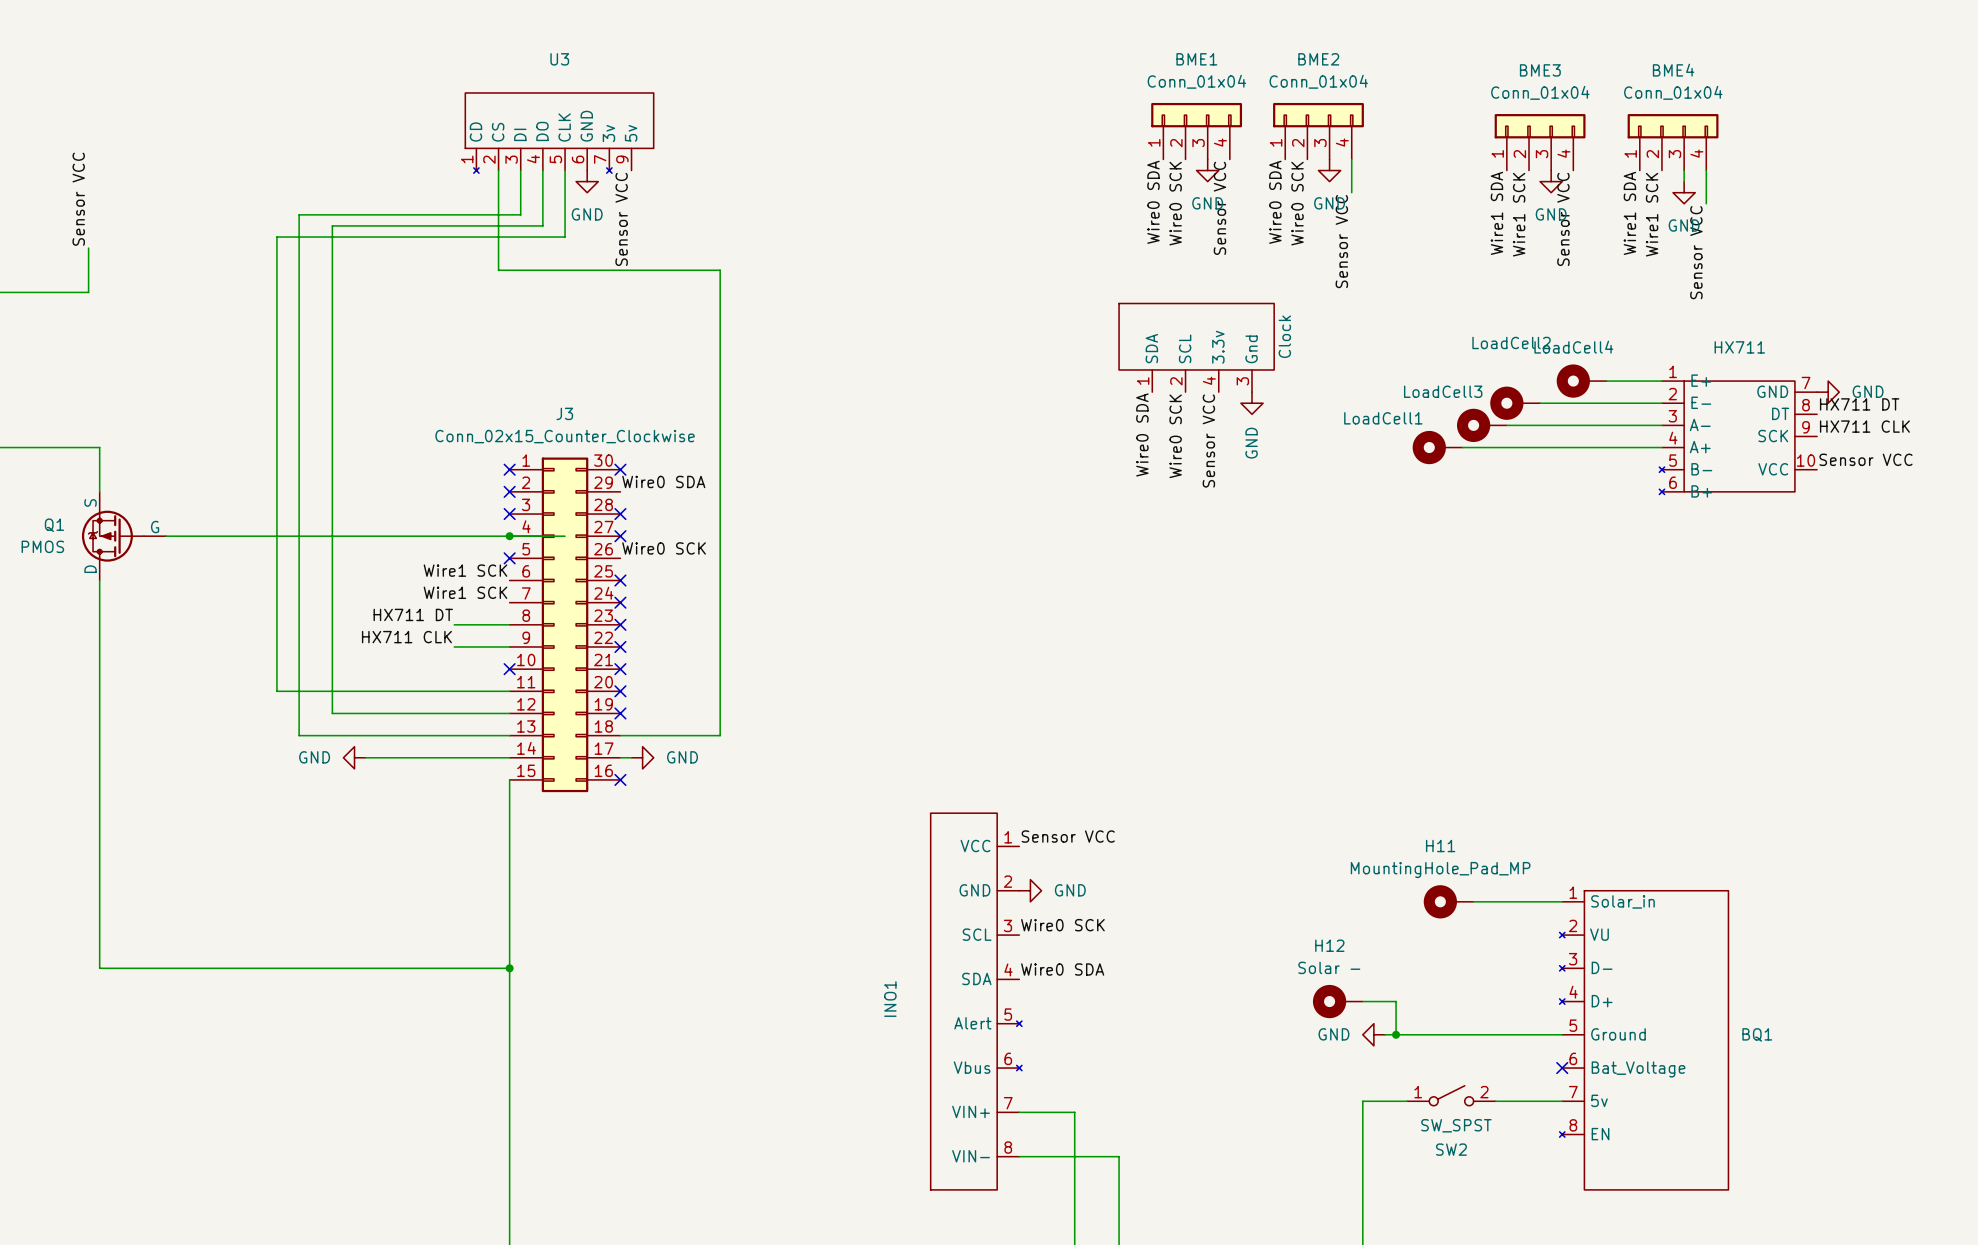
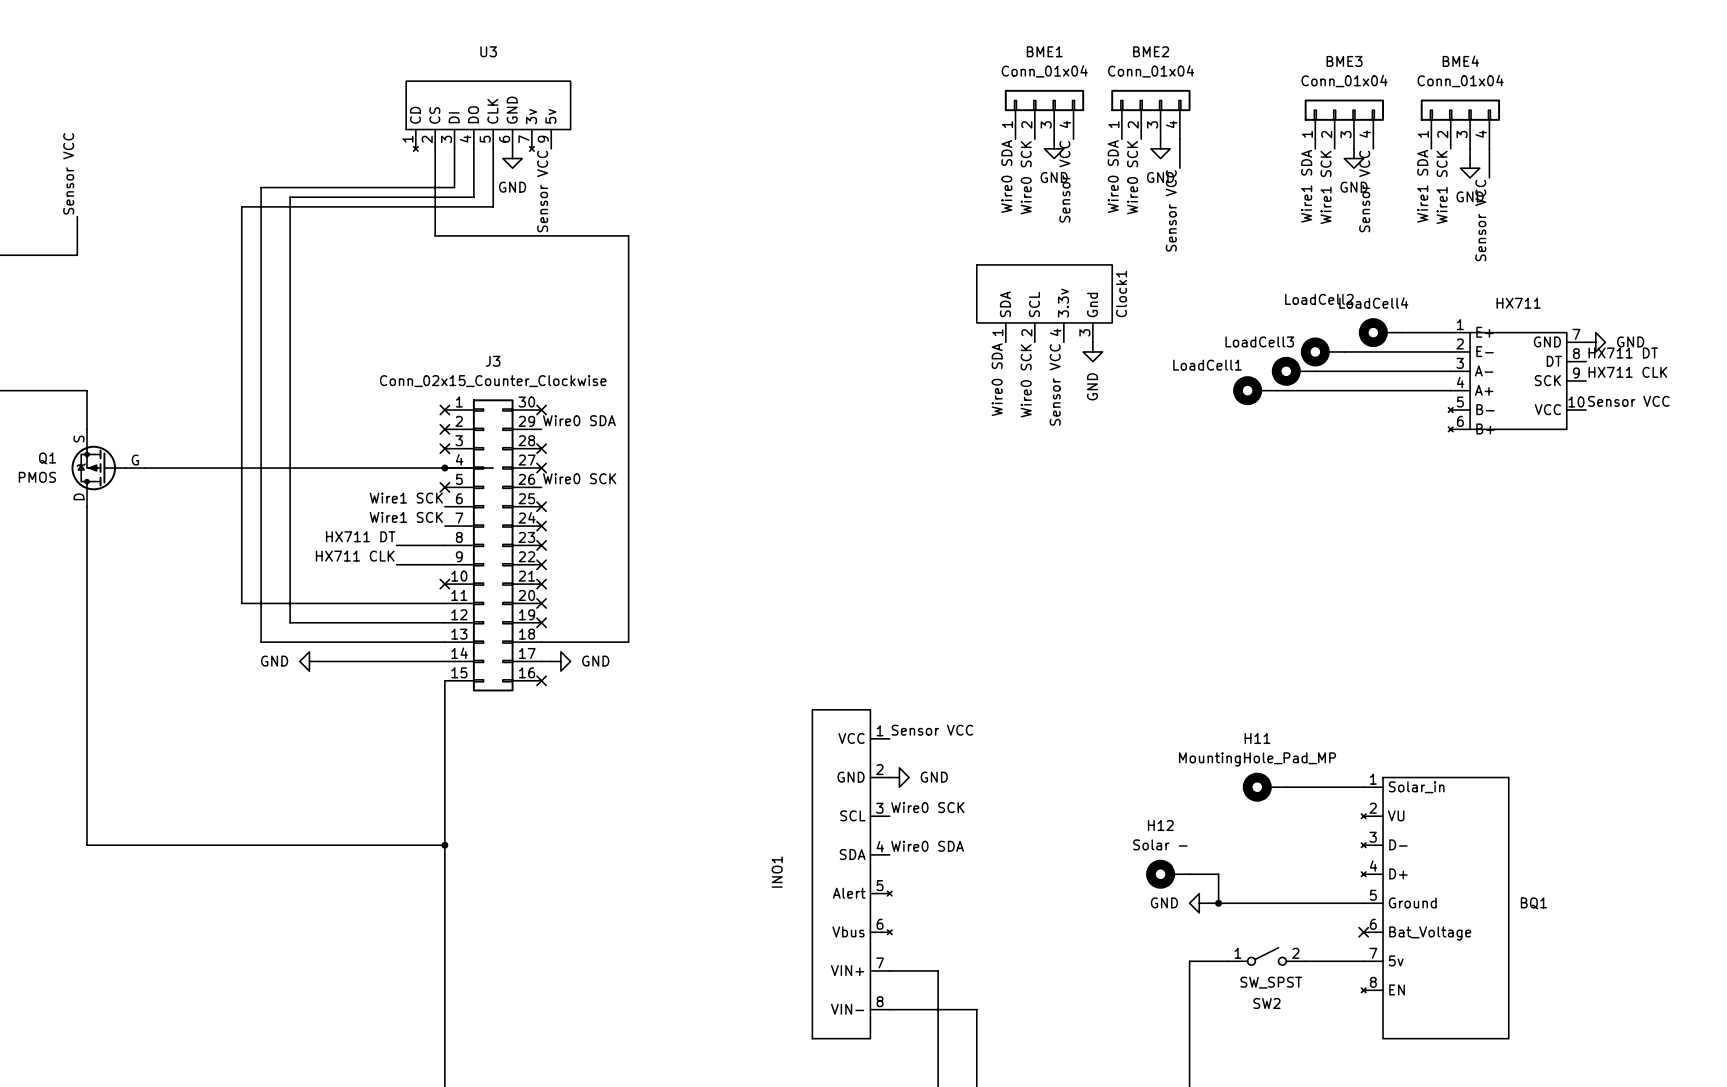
Clock name: Clock (1284, 336) -> Clock1 (1121, 293)

